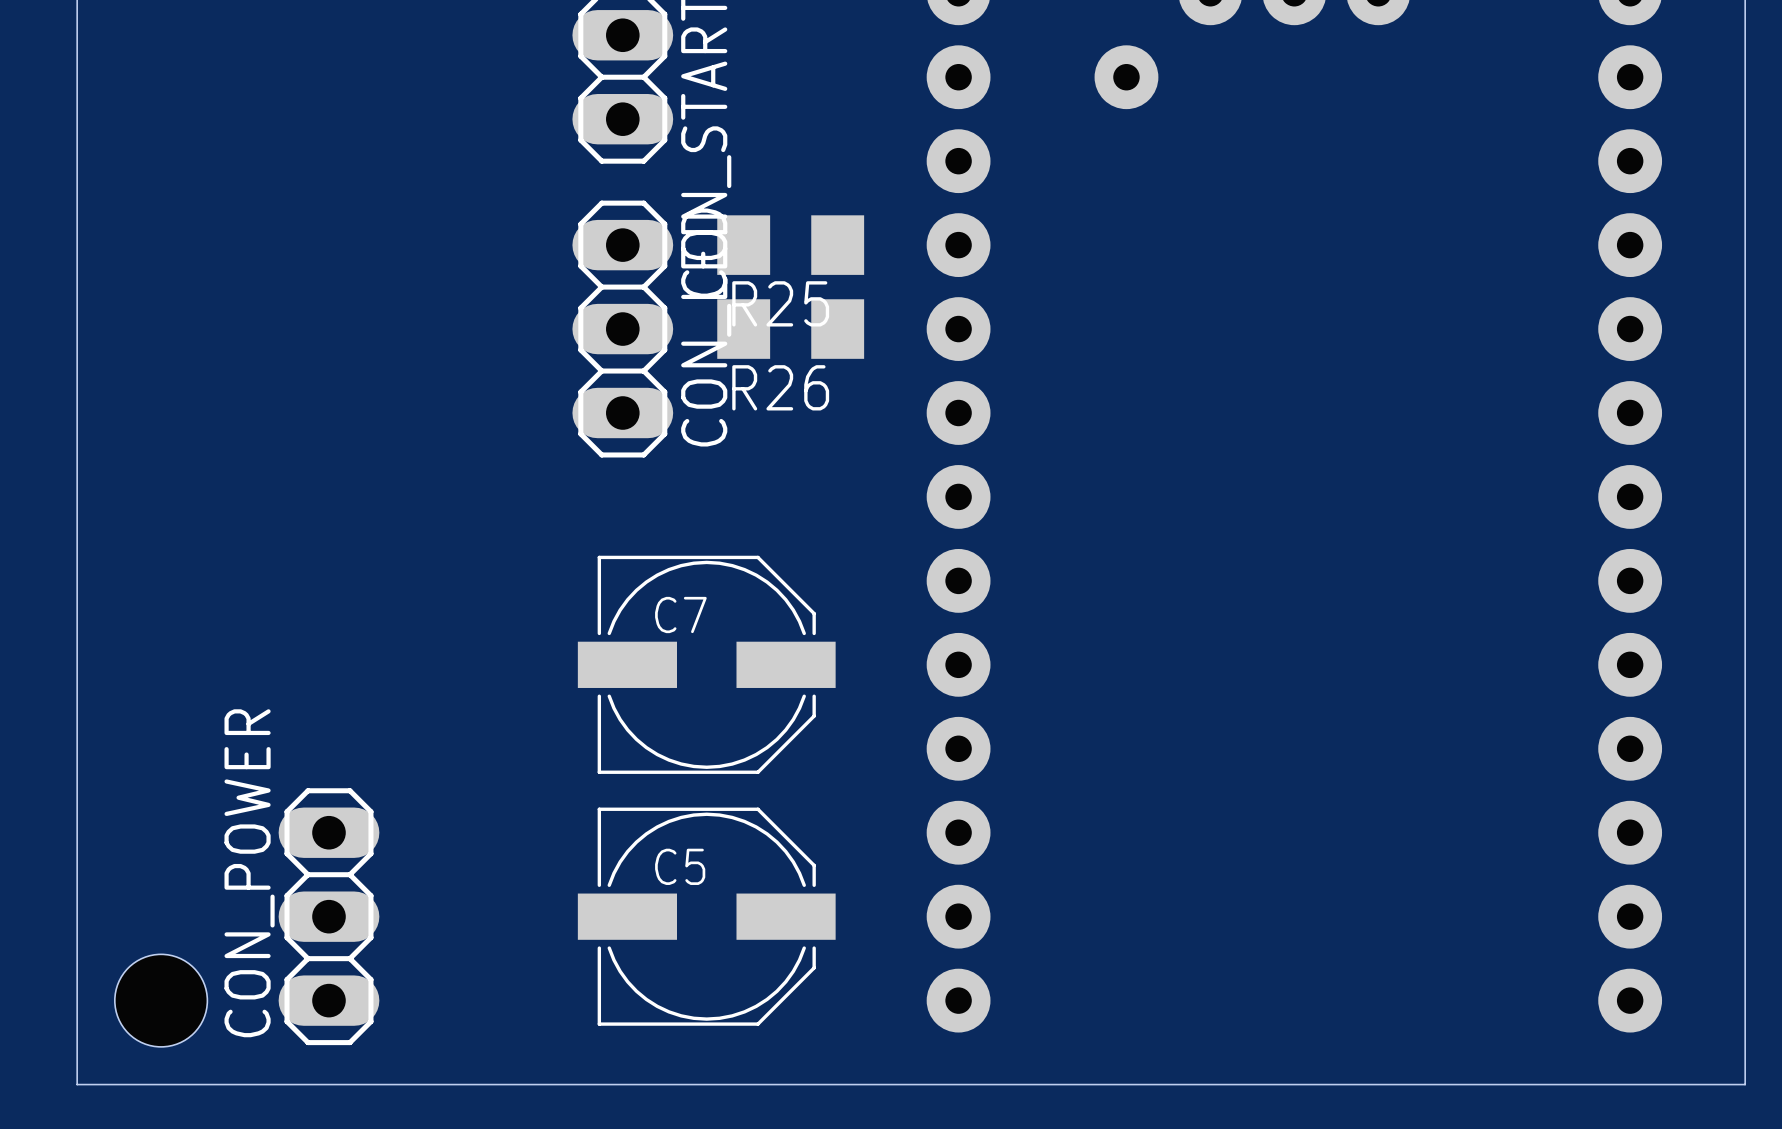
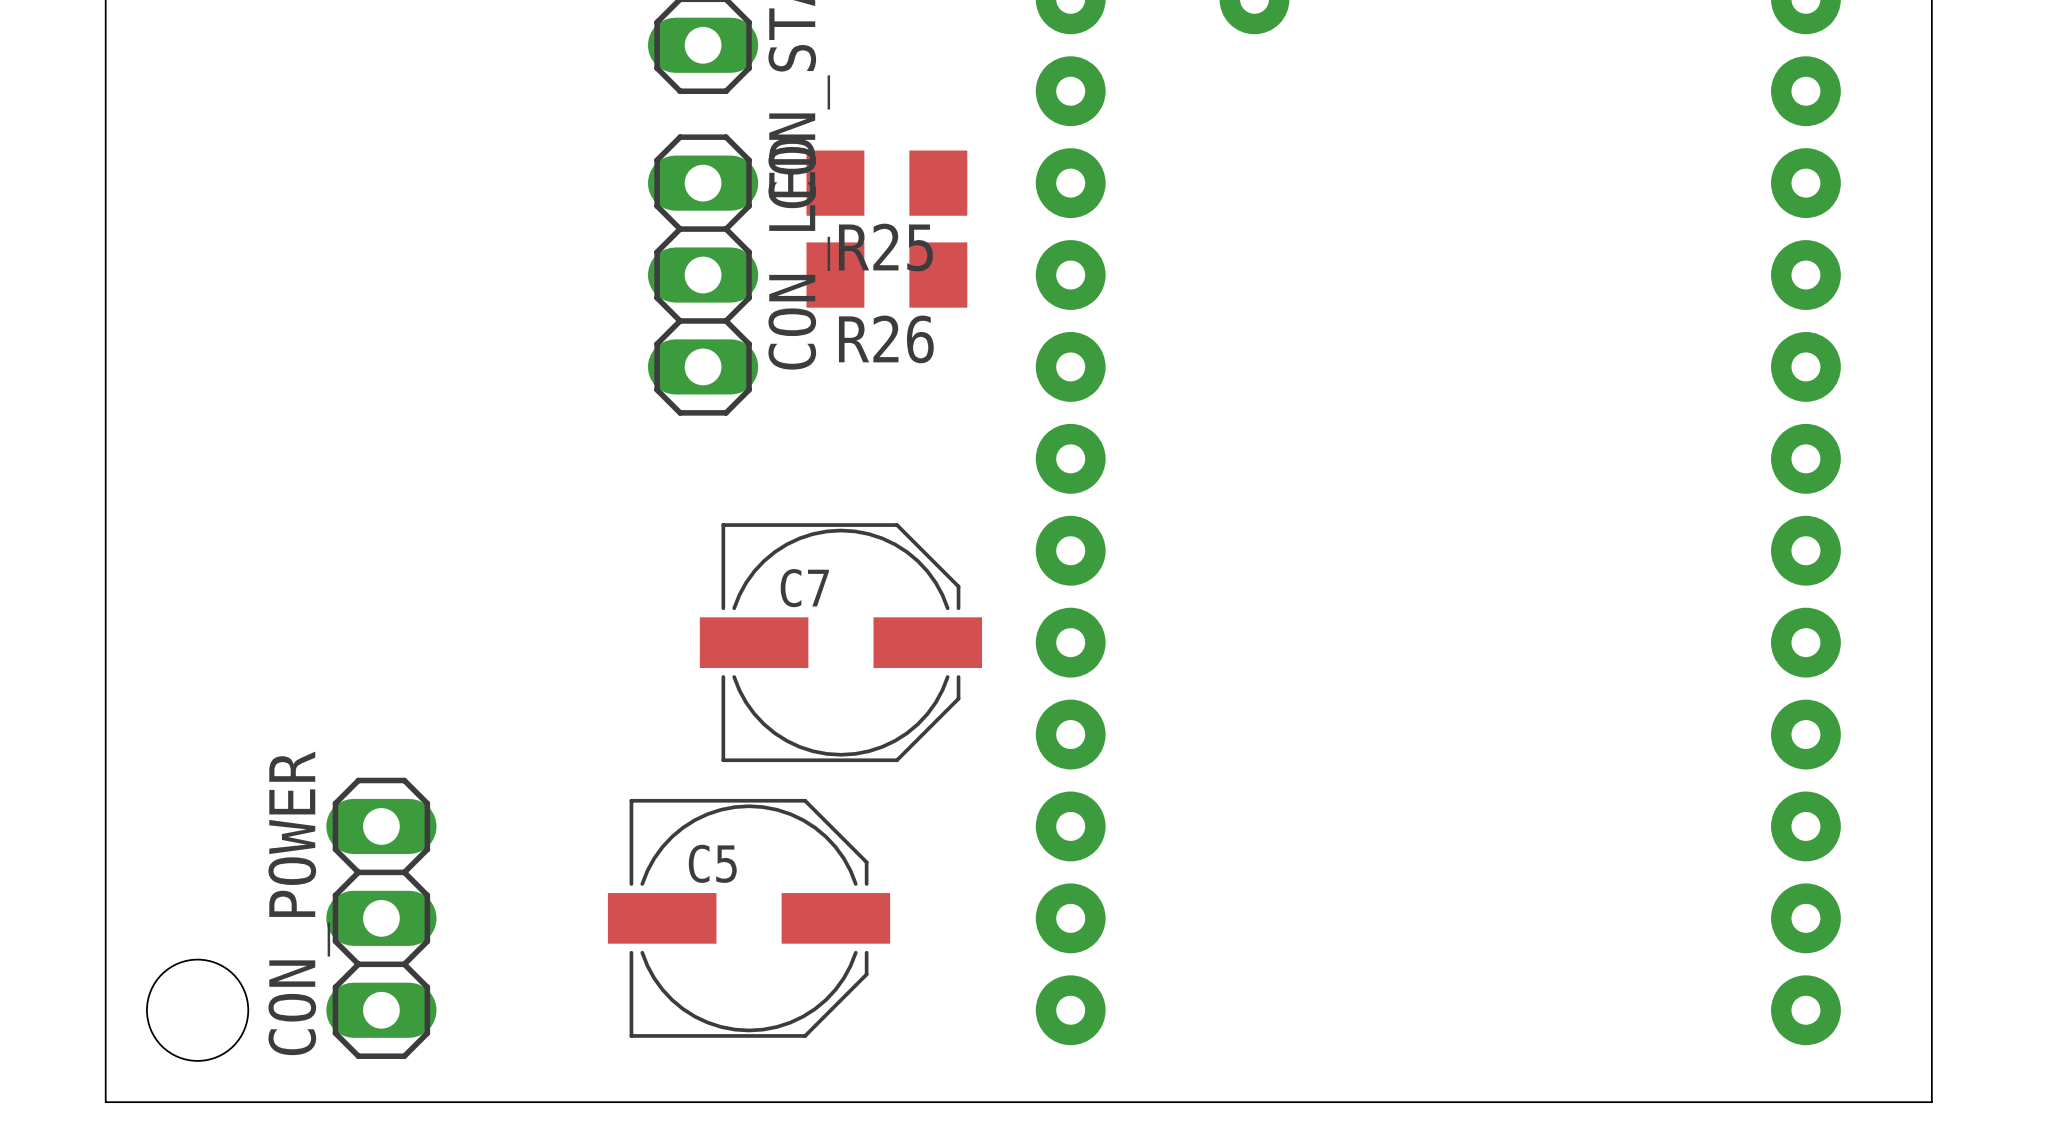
C7 position: (706, 664) -> (840, 642)
C5 position: (706, 916) -> (749, 918)

